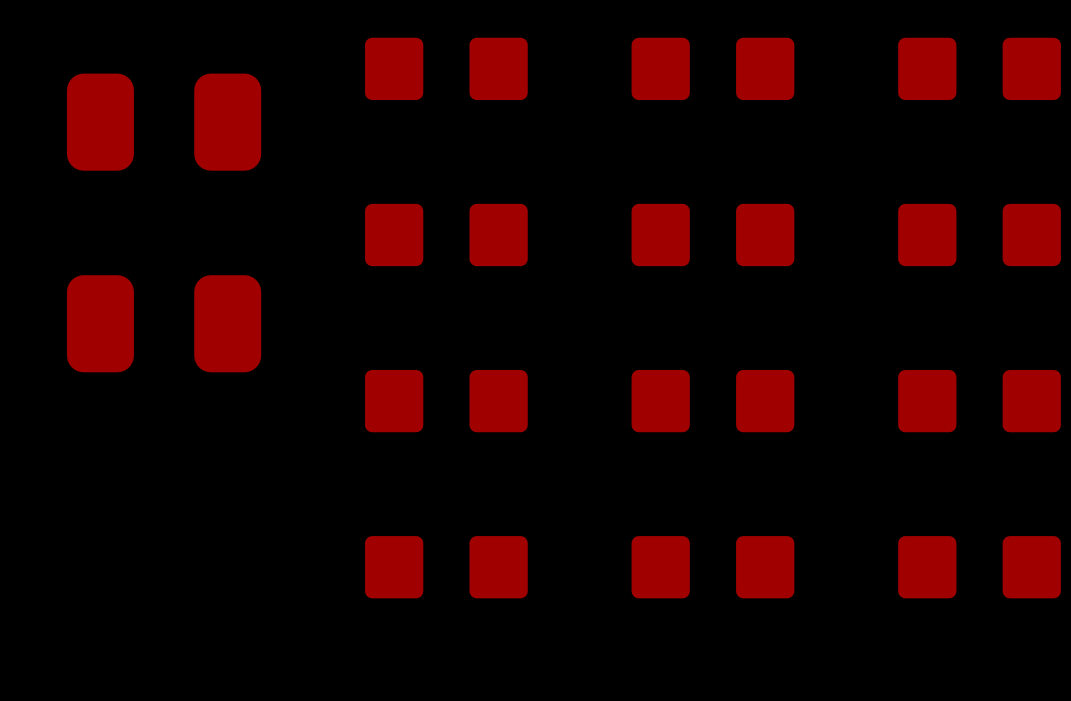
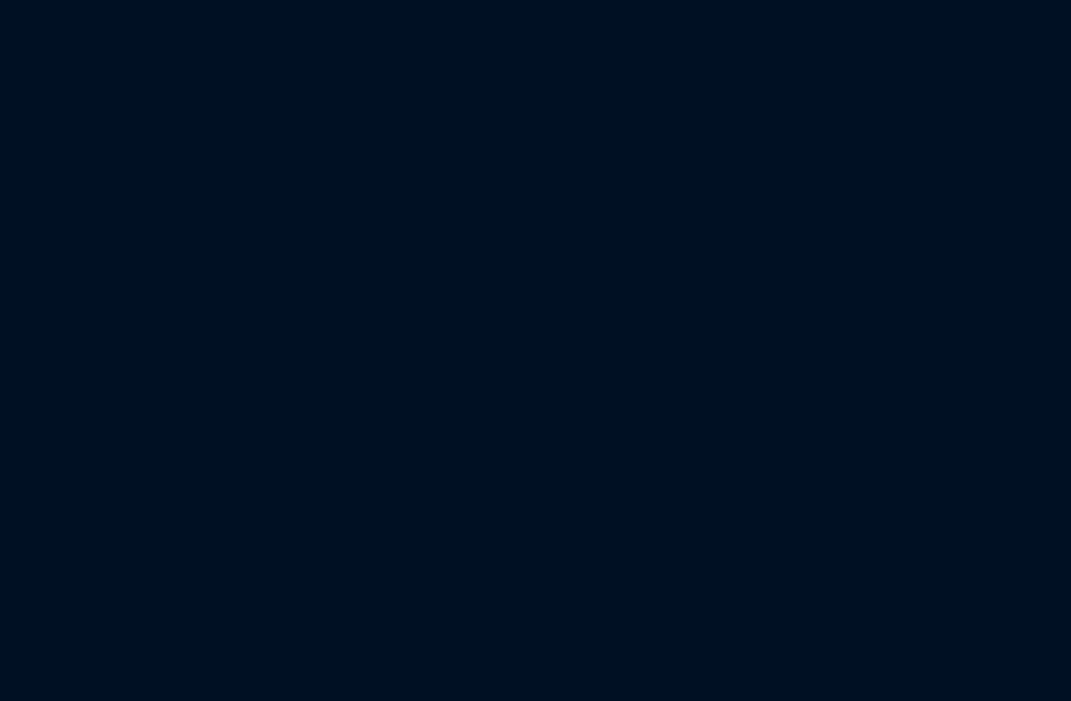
part: (446, 68) -> none
part: (712, 68) -> none
part: (979, 68) -> none
part: (164, 122) -> none
part: (446, 235) -> none
part: (712, 235) -> none
part: (979, 235) -> none
part: (164, 323) -> none
part: (446, 401) -> none
part: (712, 401) -> none
part: (979, 401) -> none
part: (446, 567) -> none
part: (712, 567) -> none
part: (979, 567) -> none

